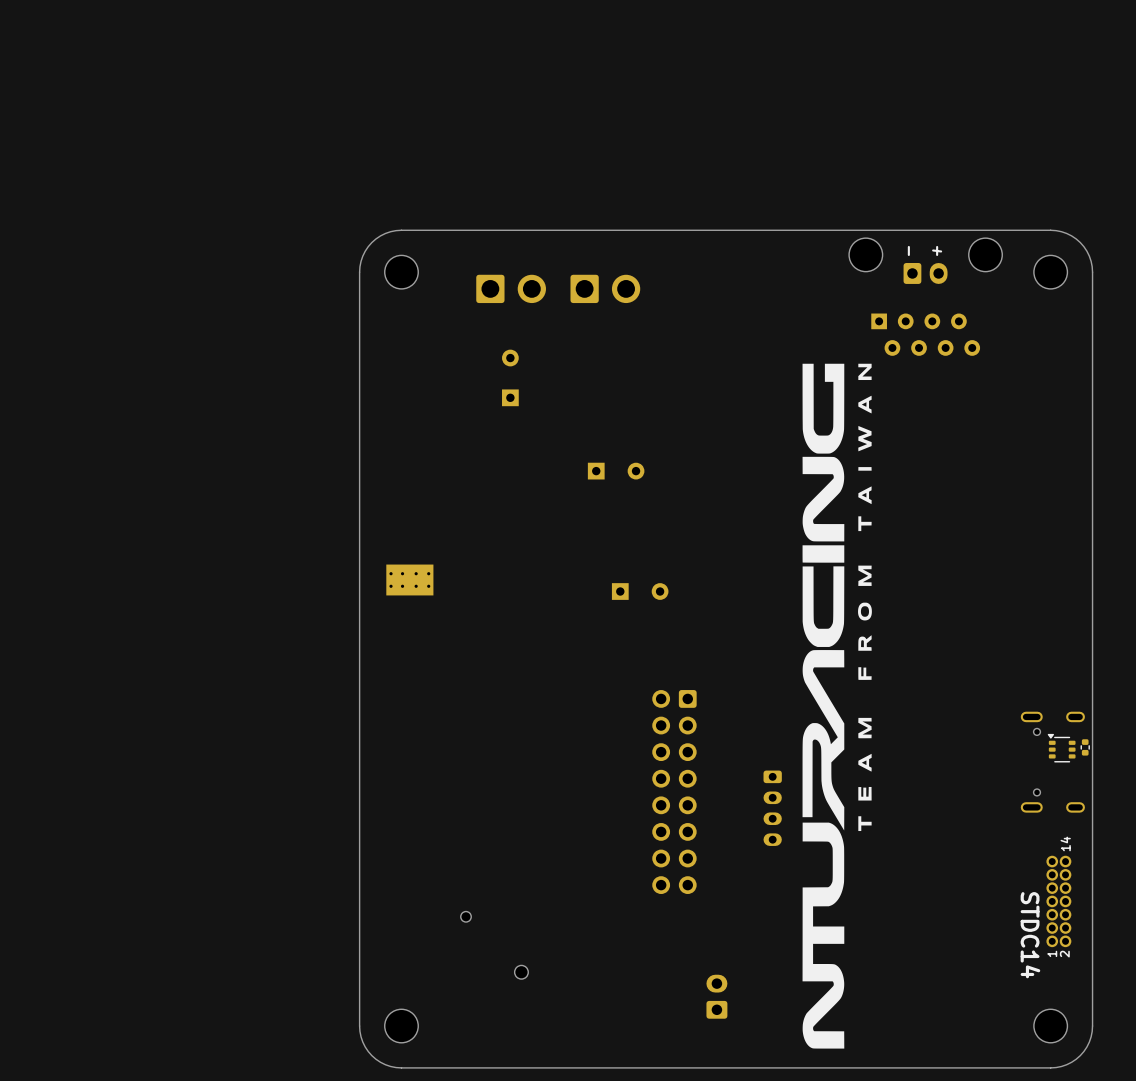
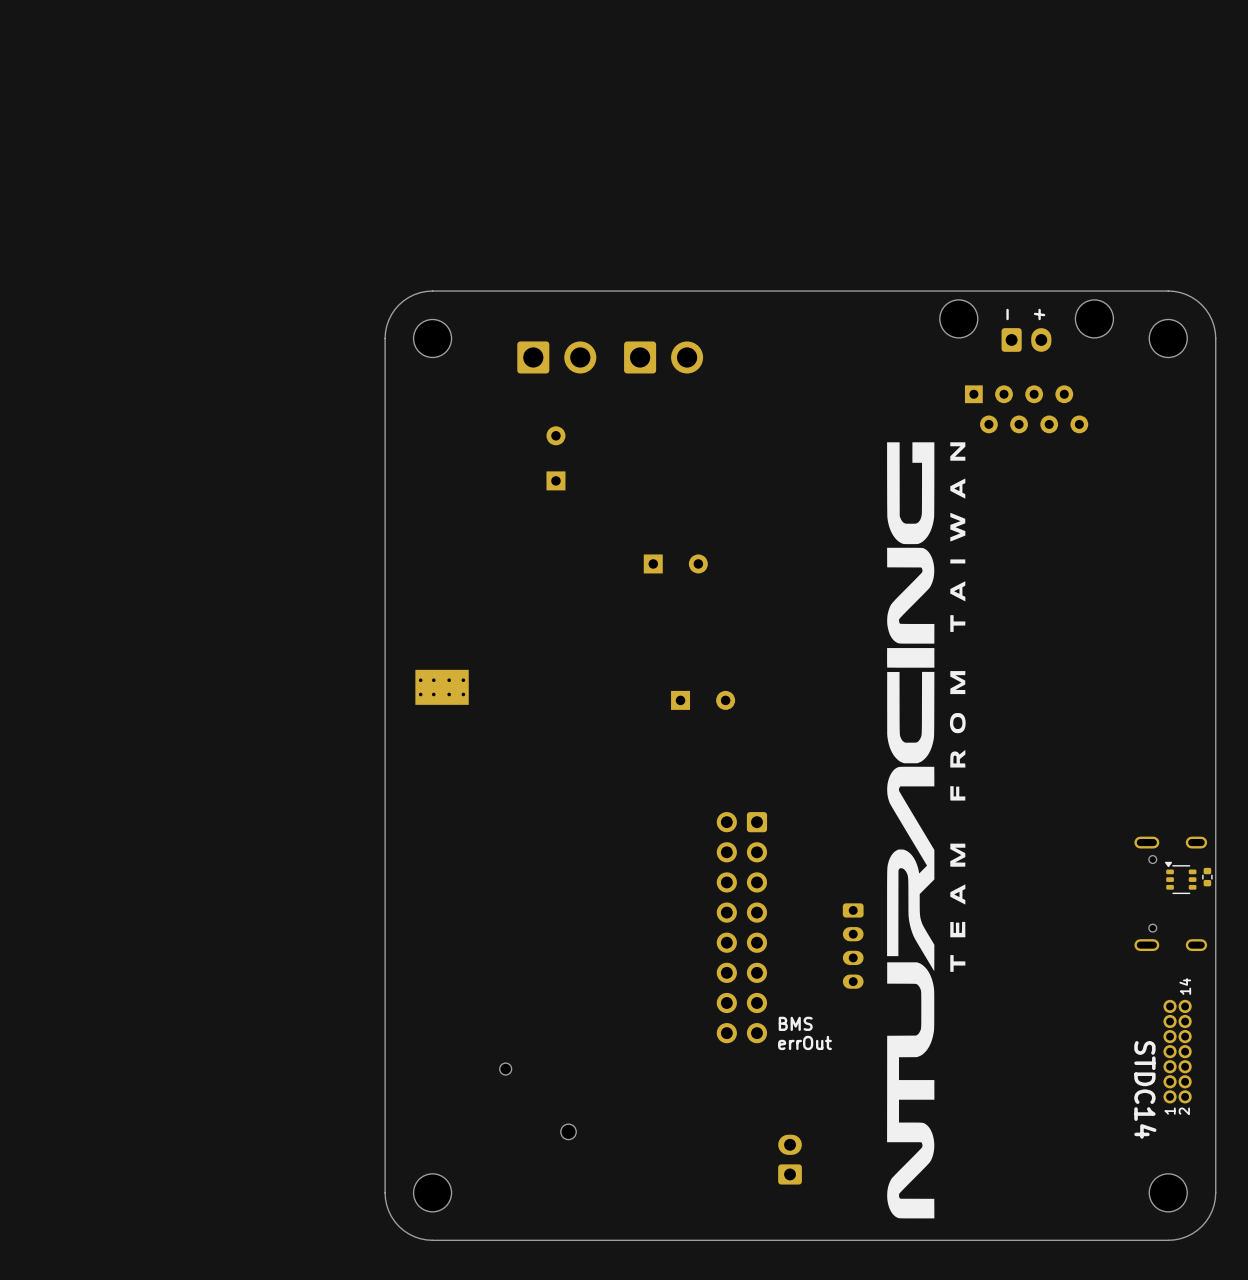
text: none -> BMS (795, 1023)
text: none -> errOut (805, 1042)

